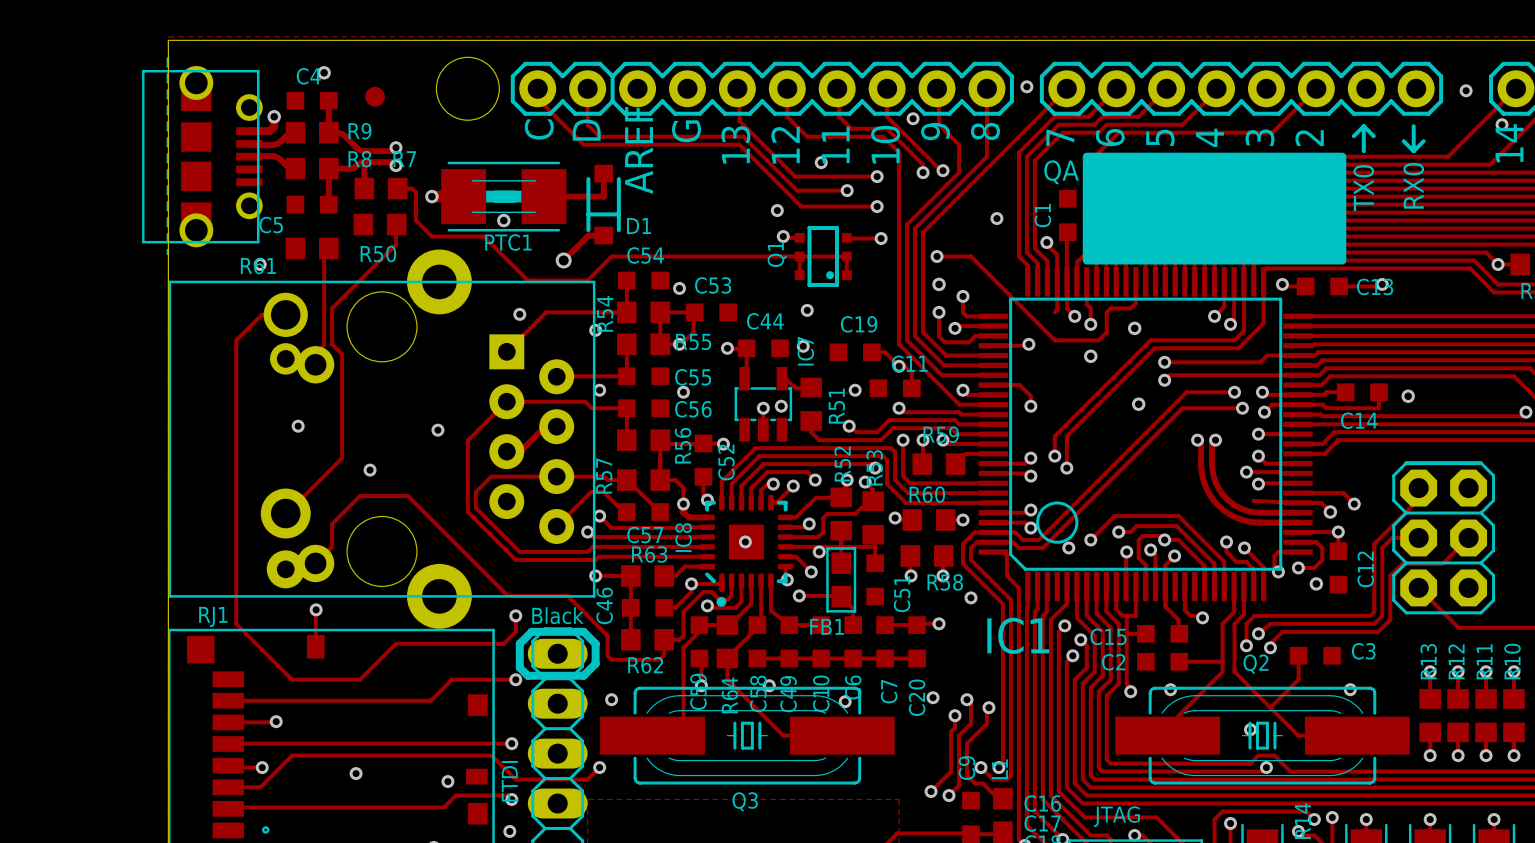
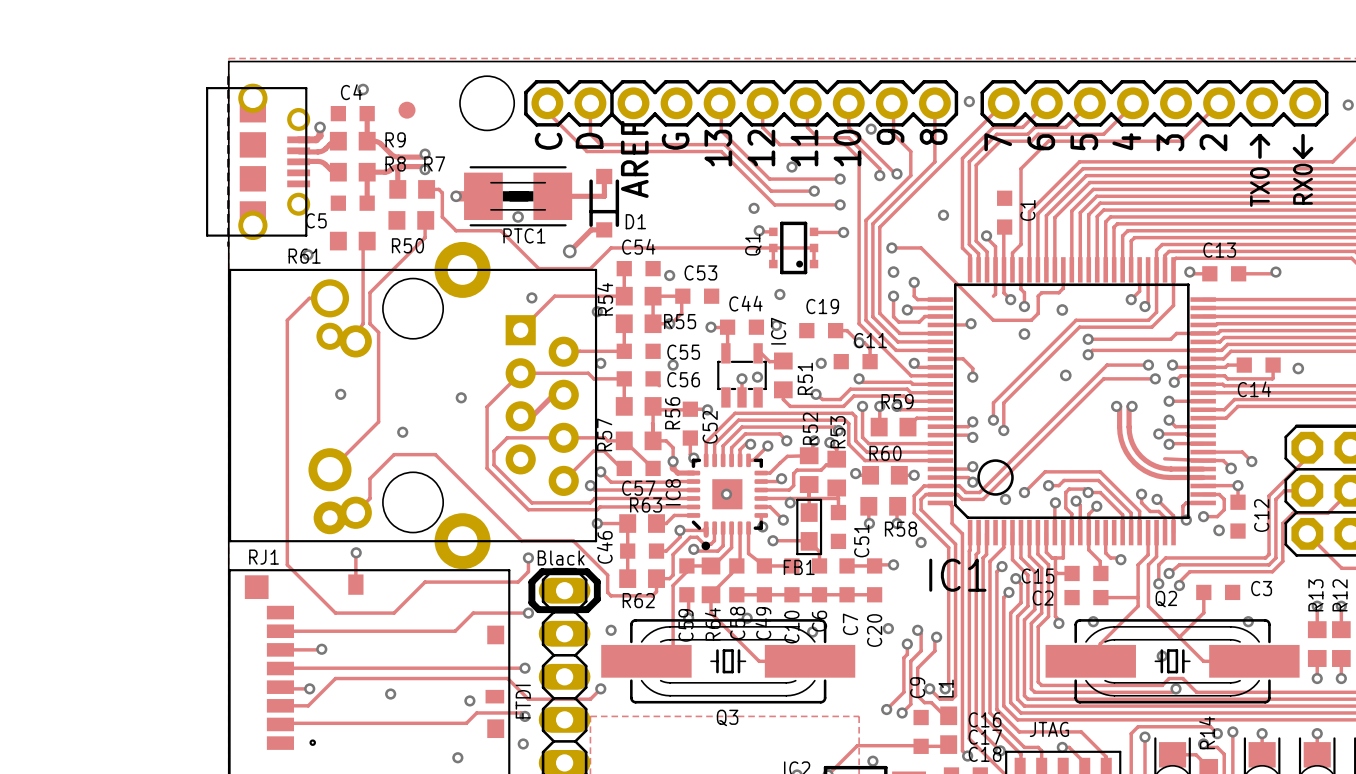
drawing: [1082, 152, 1347, 265] -> none
text: QA (1061, 172) -> none
C1 name position: C1 (1042, 215) -> C1 (1027, 210)
C13 name position: C13 (1375, 286) -> C13 (1219, 250)

